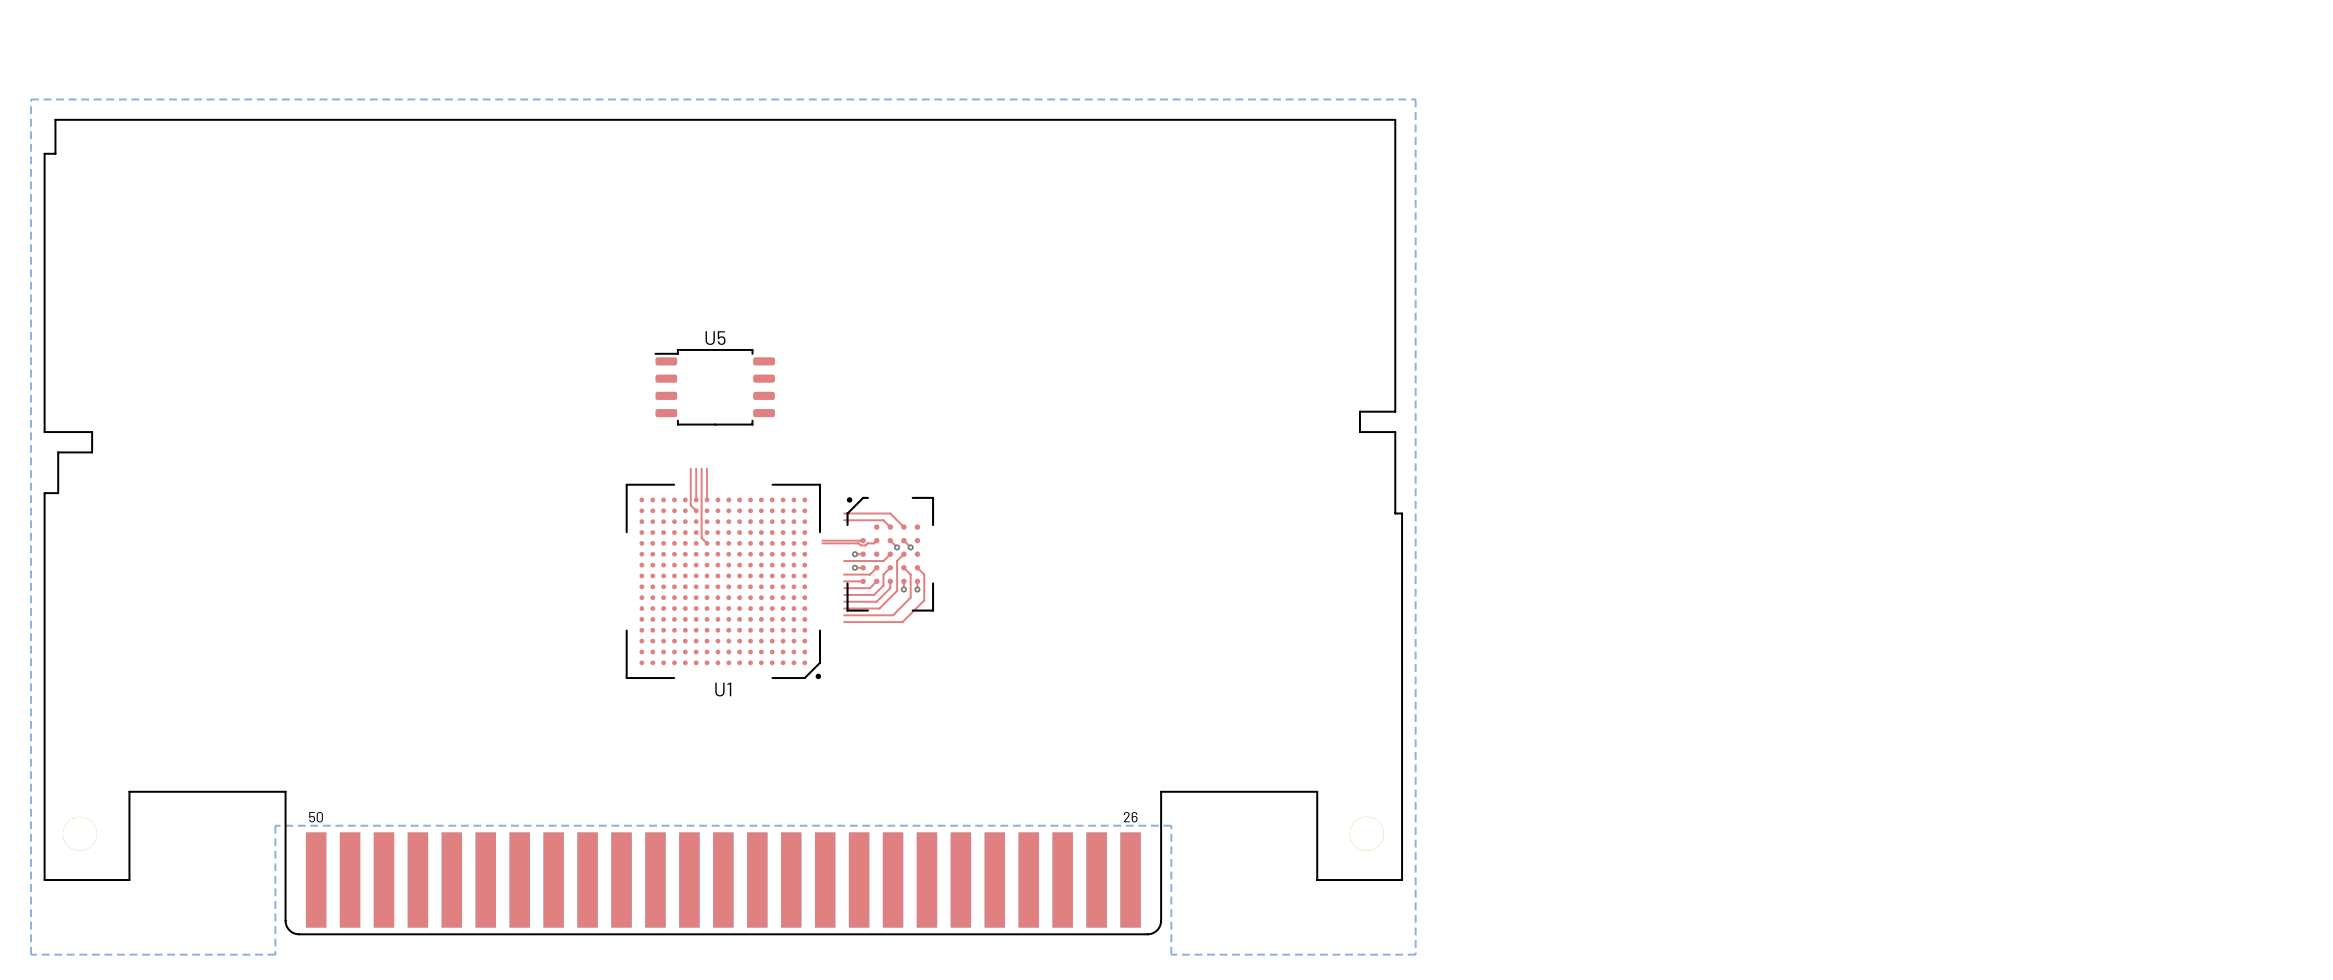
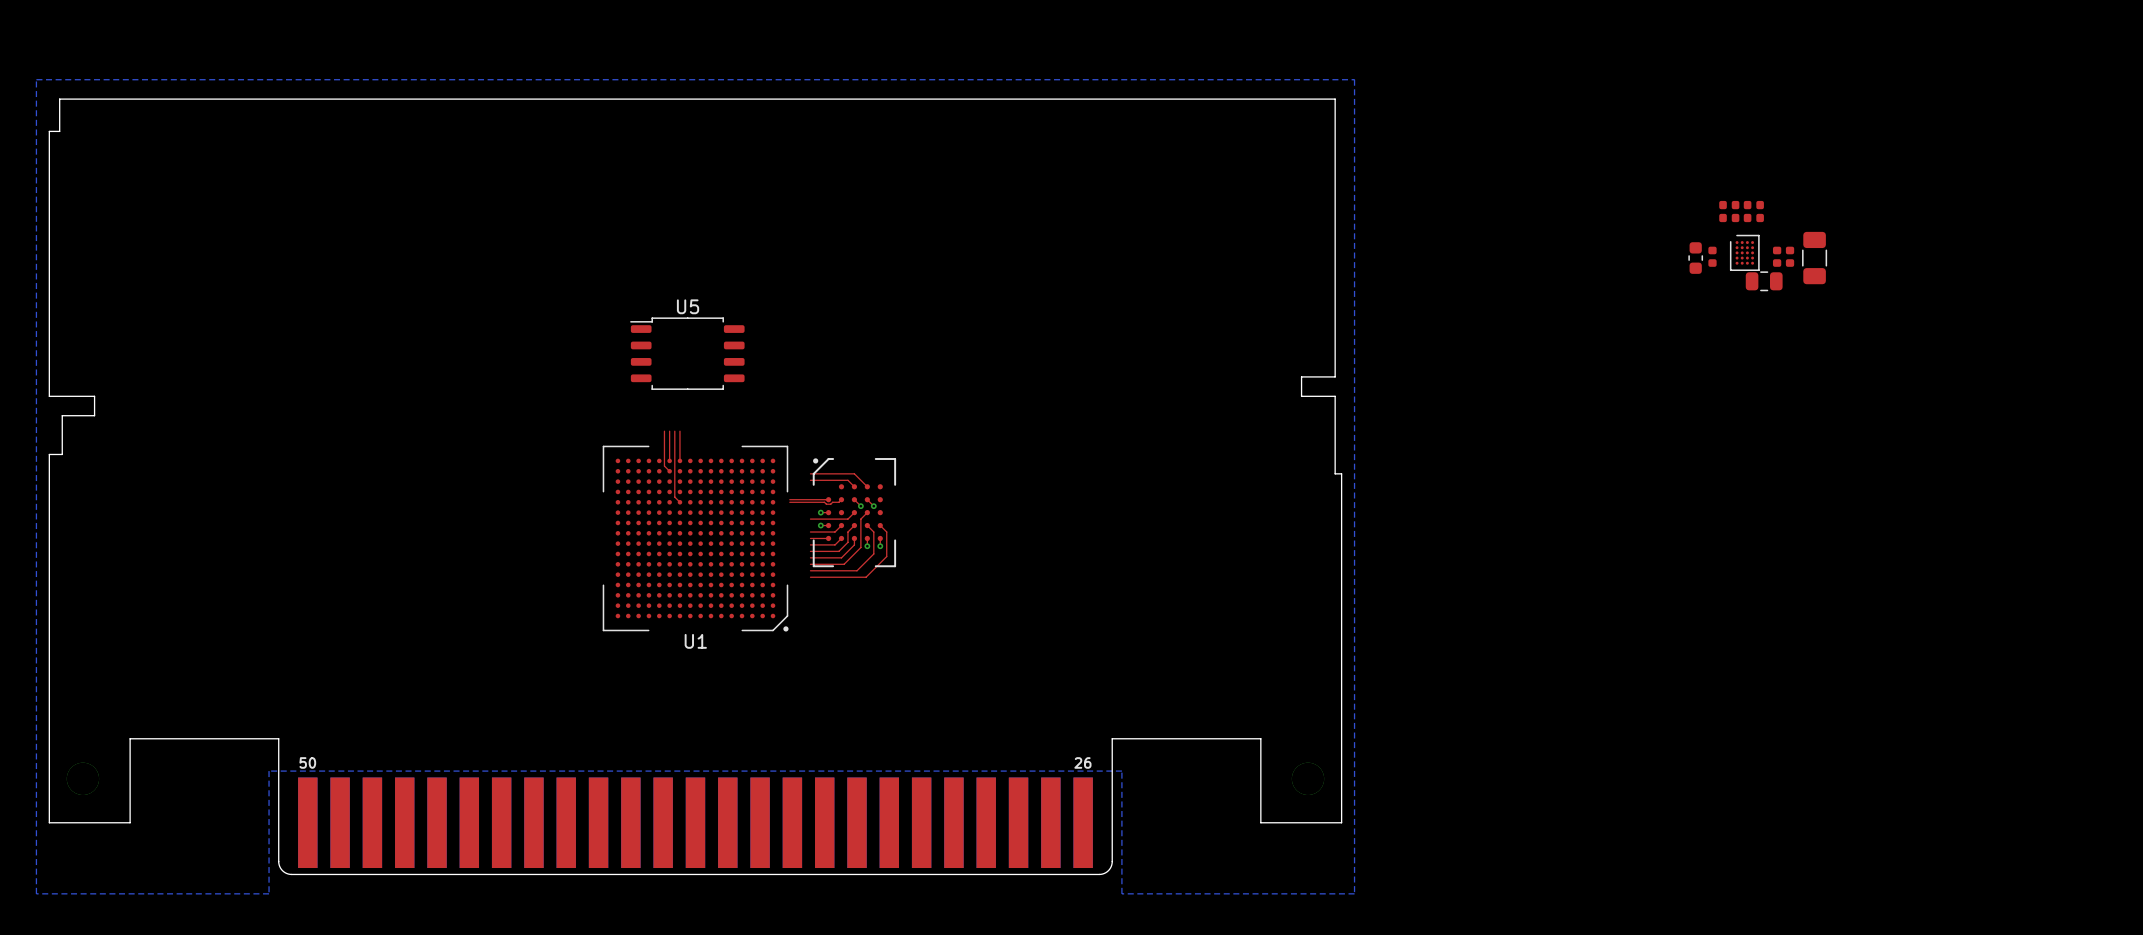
part: none -> (1729, 205)
part: none -> (1753, 205)
part: none -> (1729, 217)
part: none -> (1753, 217)
part: none -> (1744, 252)
part: none -> (1712, 256)
part: none -> (1777, 256)
part: none -> (1790, 256)
part: none -> (1695, 258)
part: none -> (1814, 258)
part: none -> (1764, 281)

